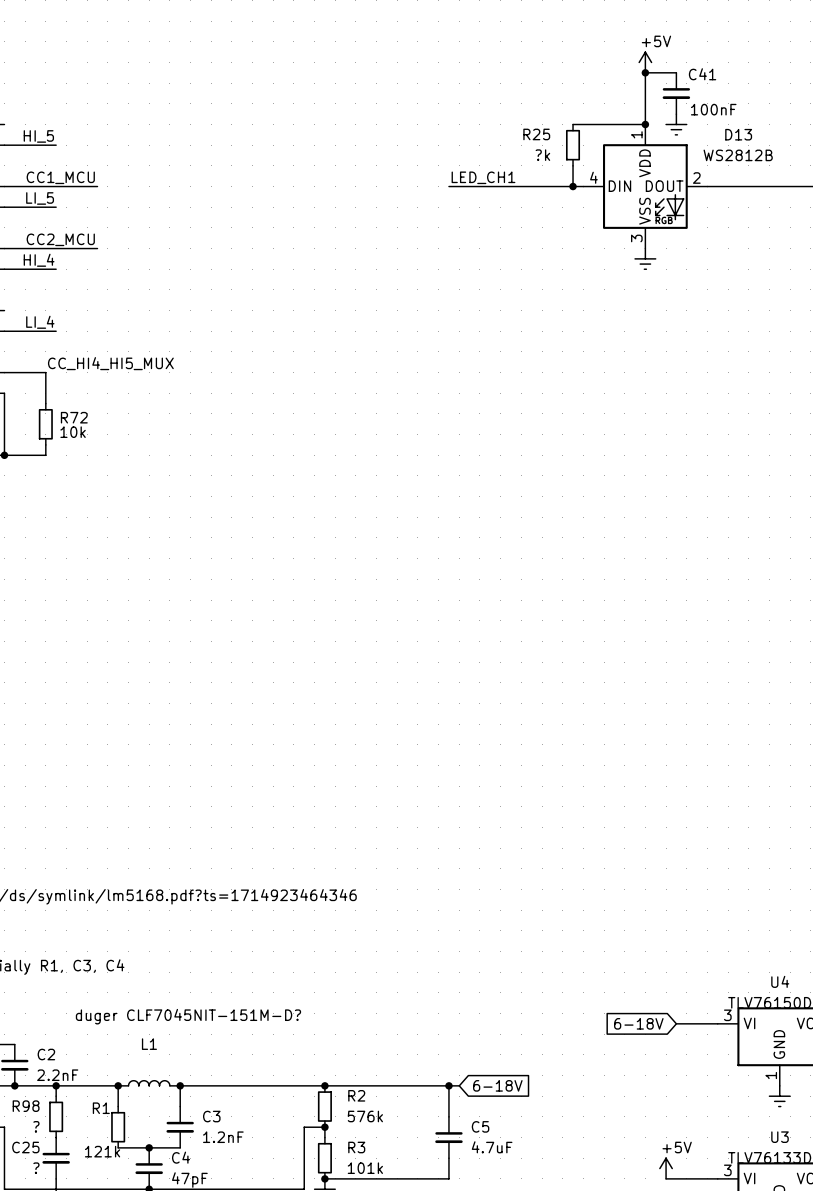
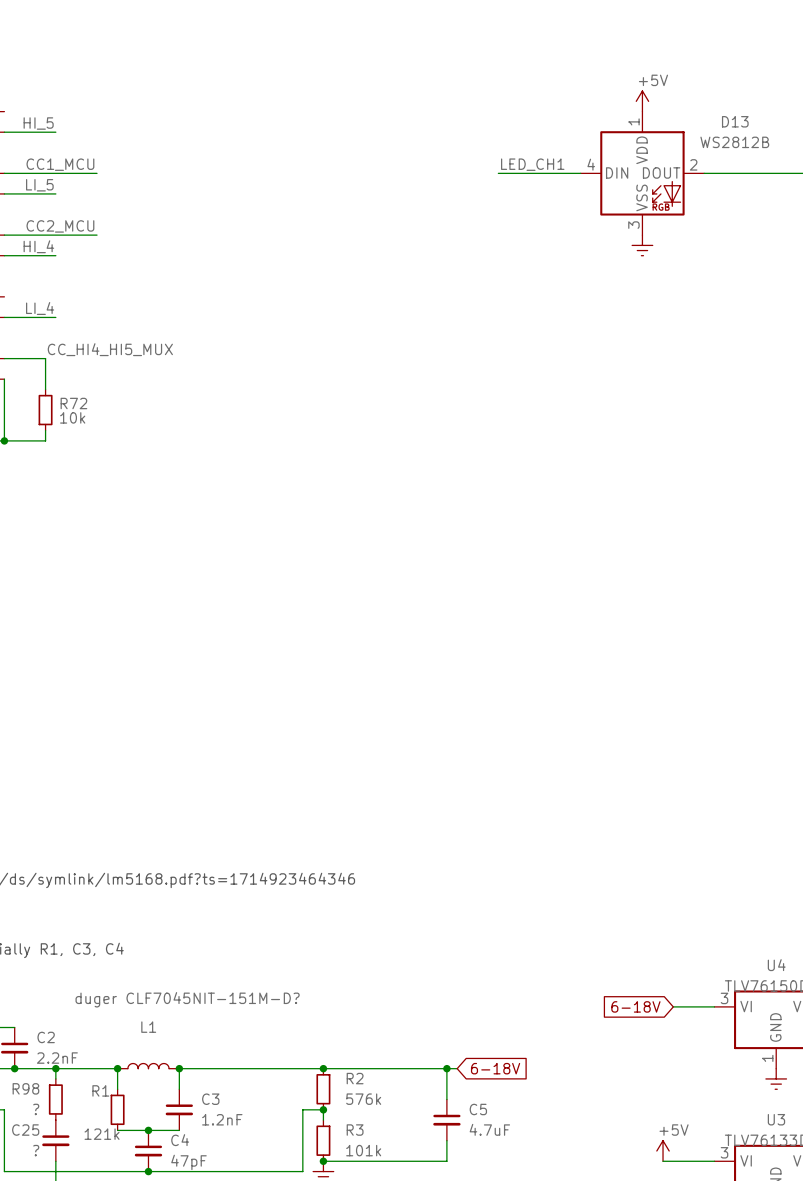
power symbol position: +5V (645, 62) -> +5V (642, 101)
junction: (645, 72) -> none
wire: (676, 72) (645, 72) (645, 124) (573, 124) -> none
C41: 100nF (676, 93) -> none
junction: (645, 124) -> none
power symbol: (676, 124) -> none
R25: ?k (573, 145) -> none
wire: (573, 165) (573, 186) -> none
label position: LED_CH1 (483, 177) -> LED_CH1 (532, 164)
wire: (448, 186) (500, 186) -> none
junction: (573, 186) -> none

